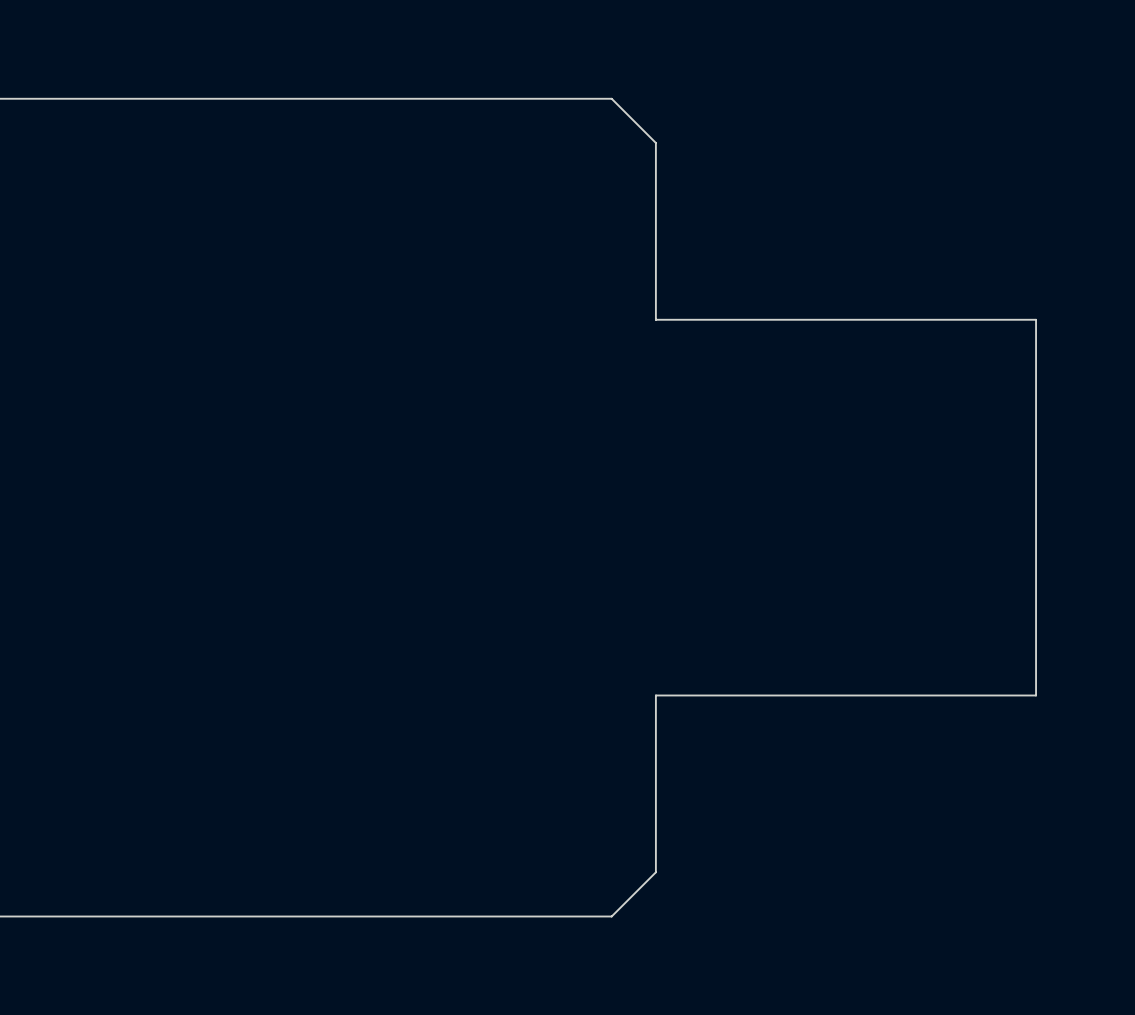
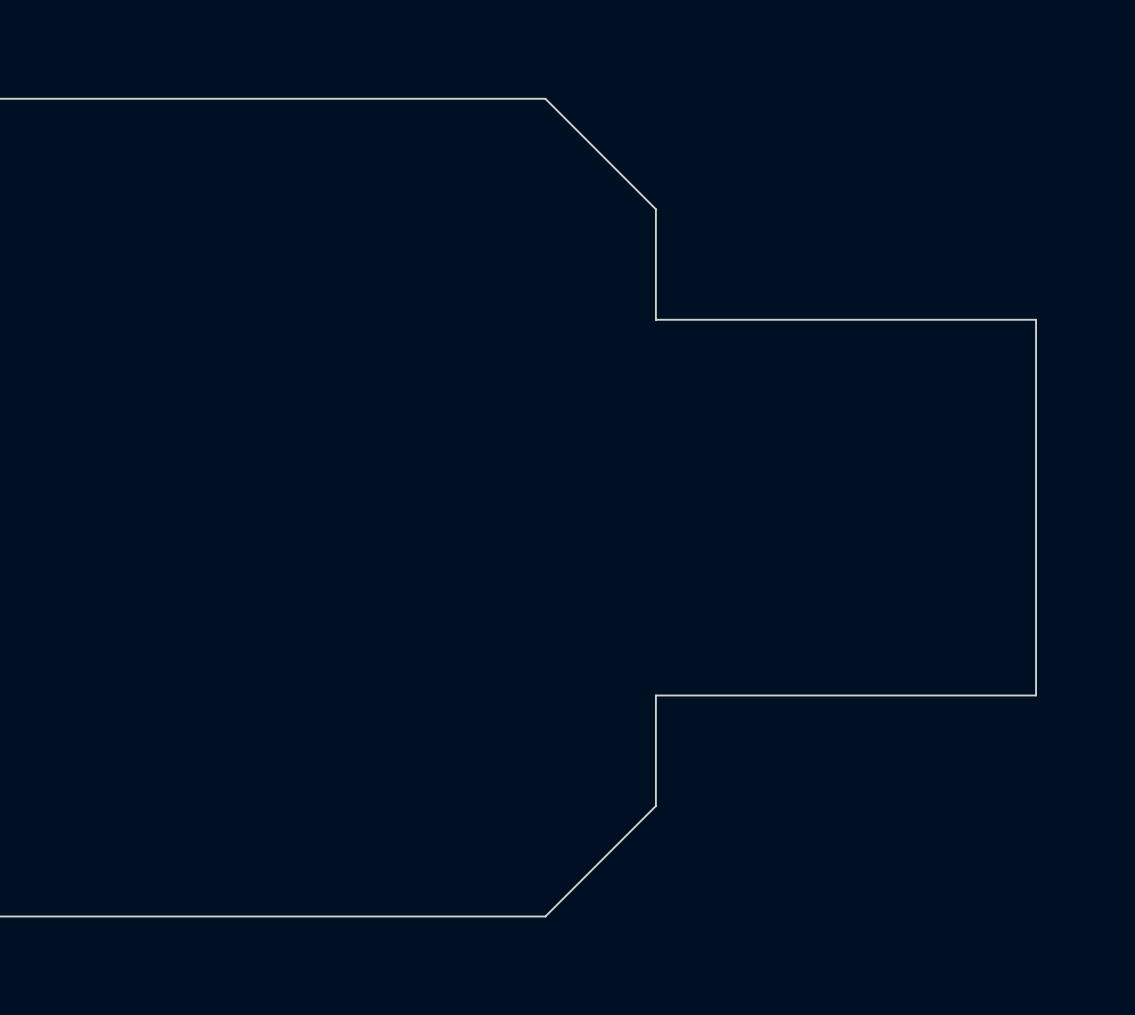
board edge: (545, 98) (611, 98) (655, 142) (655, 209) -> (545, 98) (655, 209)
board edge: (655, 805) (655, 872) (611, 916) (545, 916) -> (655, 805) (545, 916)

